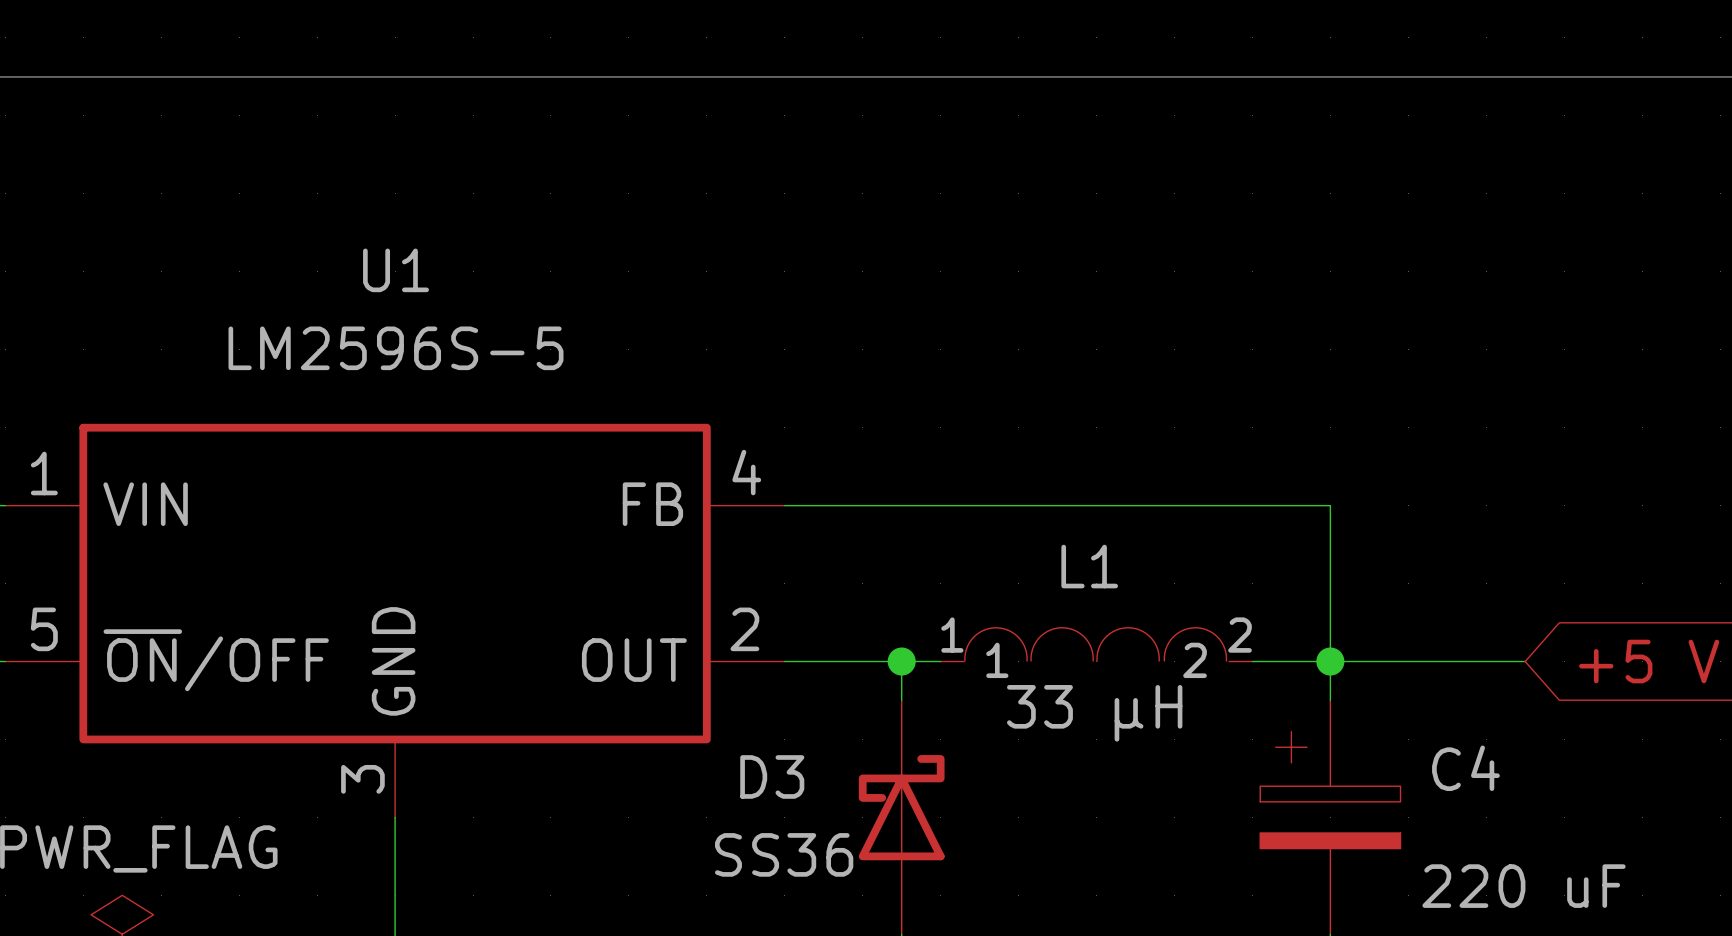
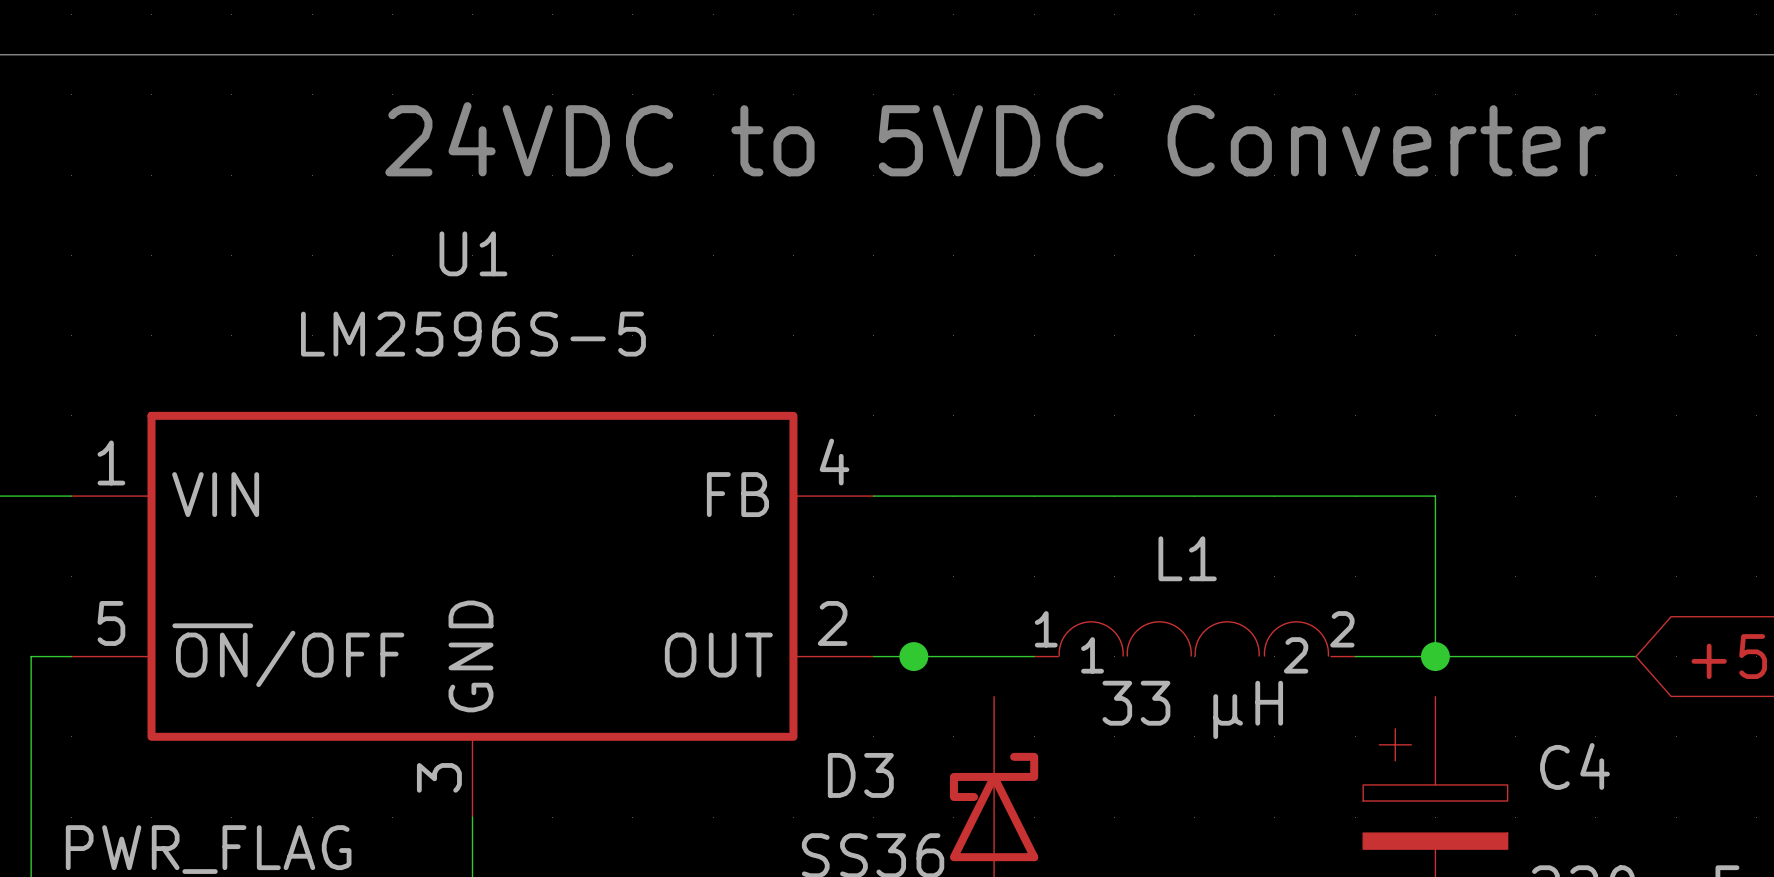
text: none -> 24VDC to 5VDC Converter (995, 139)
wire: (901, 661) (901, 700) -> none
junction position: (901, 661) -> (913, 656)
wire: (1330, 661) (1330, 700) -> none

